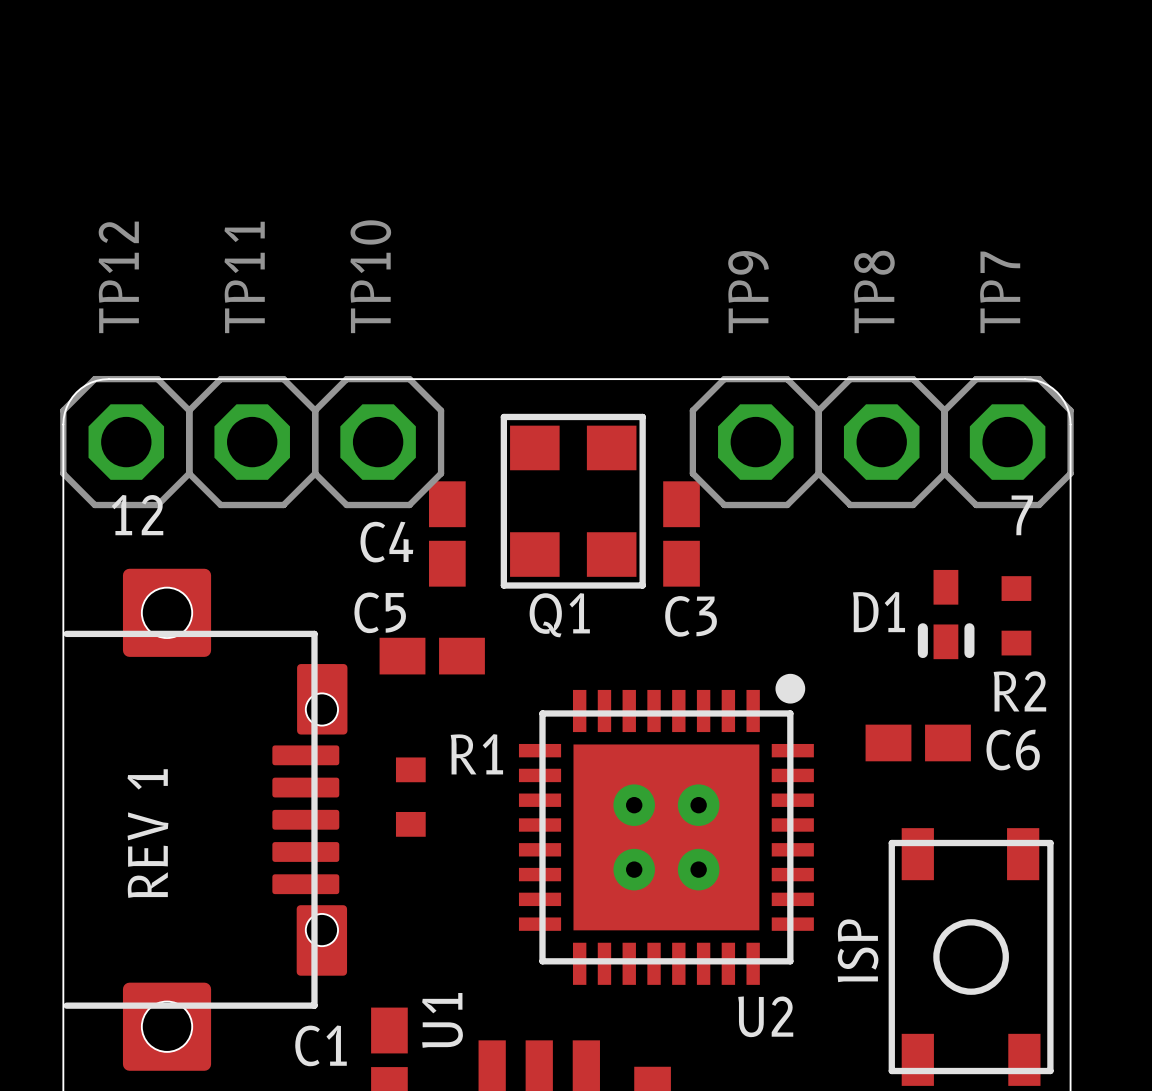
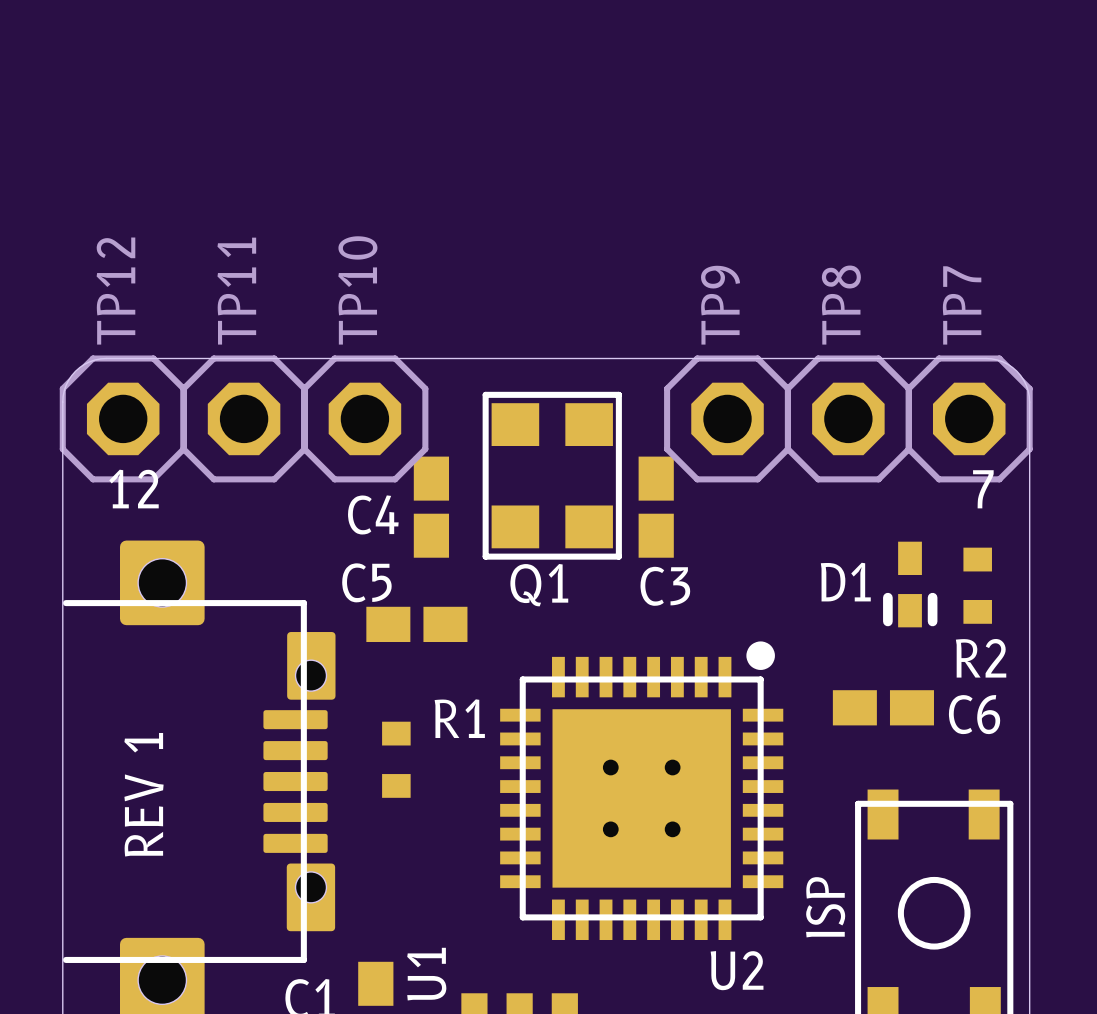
text position: TP10 (370, 276) -> TP10 (357, 290)
text position: TP12 (118, 277) -> TP12 (115, 291)
text position: TP11 (244, 277) -> TP11 (236, 291)
text position: TP8 (874, 291) -> TP8 (841, 305)
text position: TP9 (748, 292) -> TP9 (720, 305)
text position: TP7 (1000, 292) -> TP7 (962, 305)

